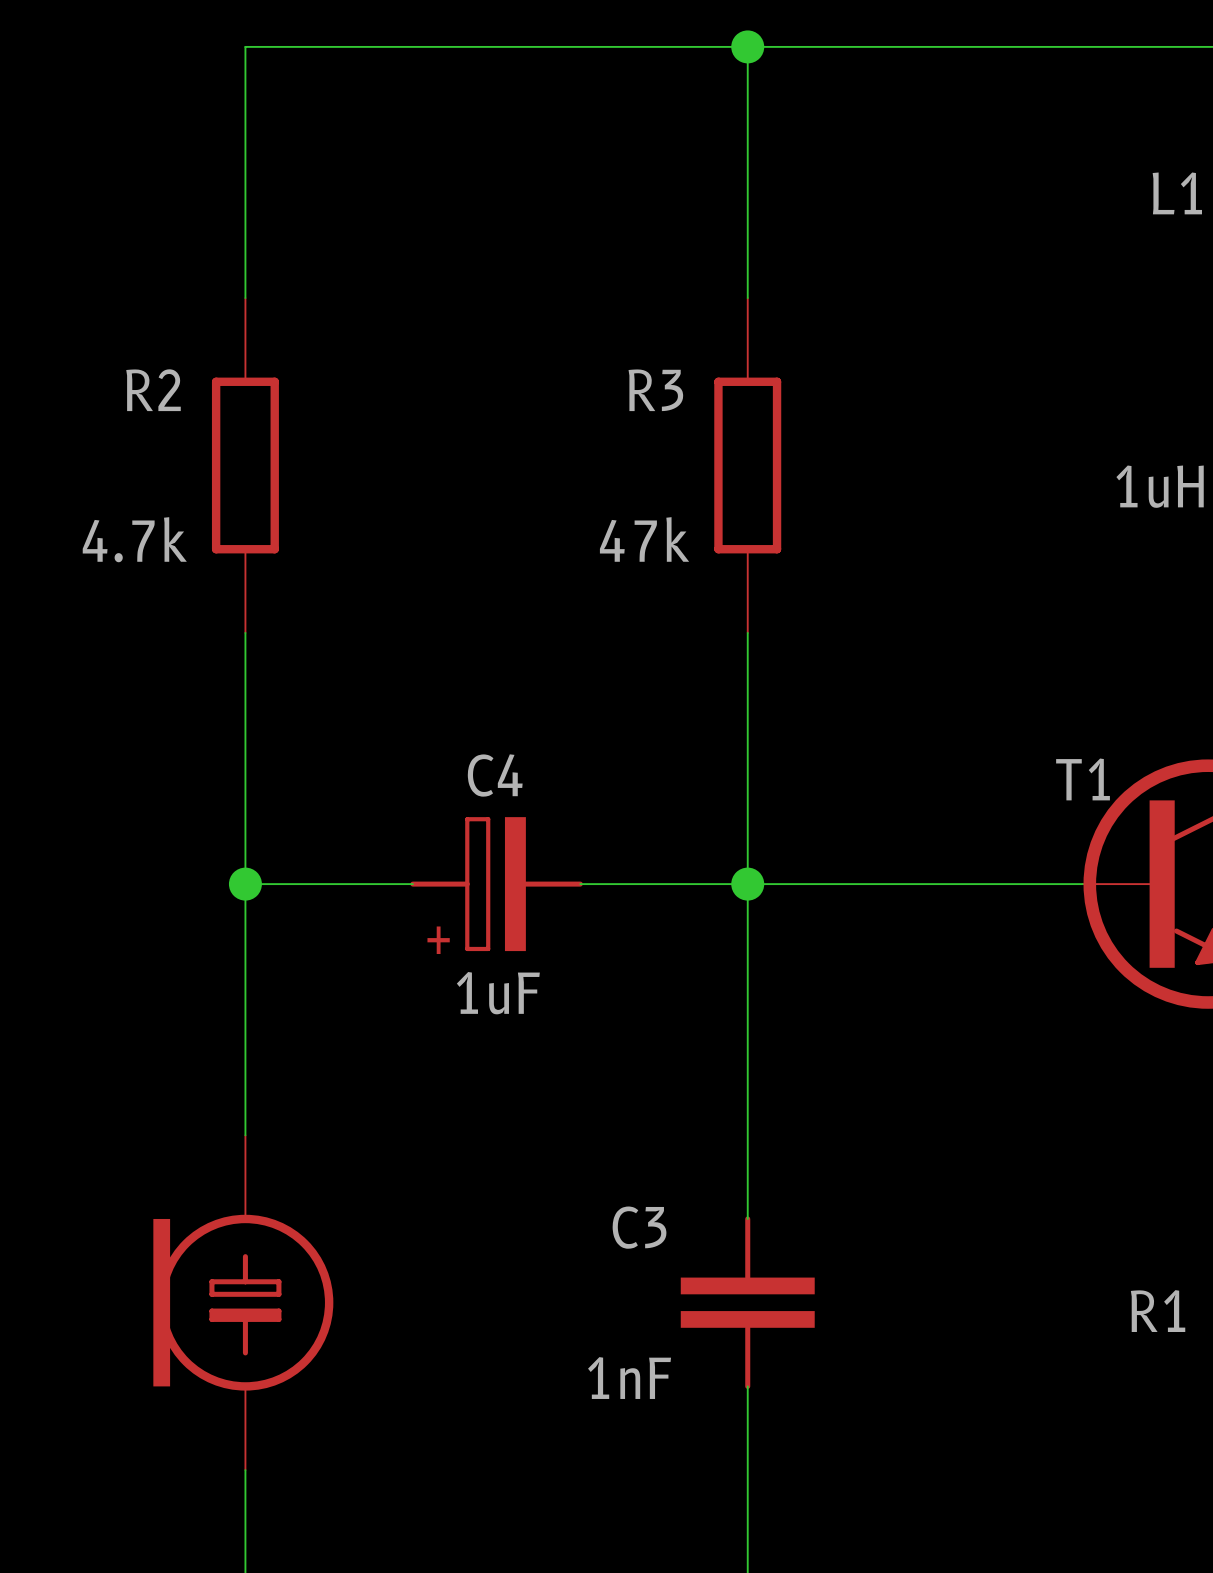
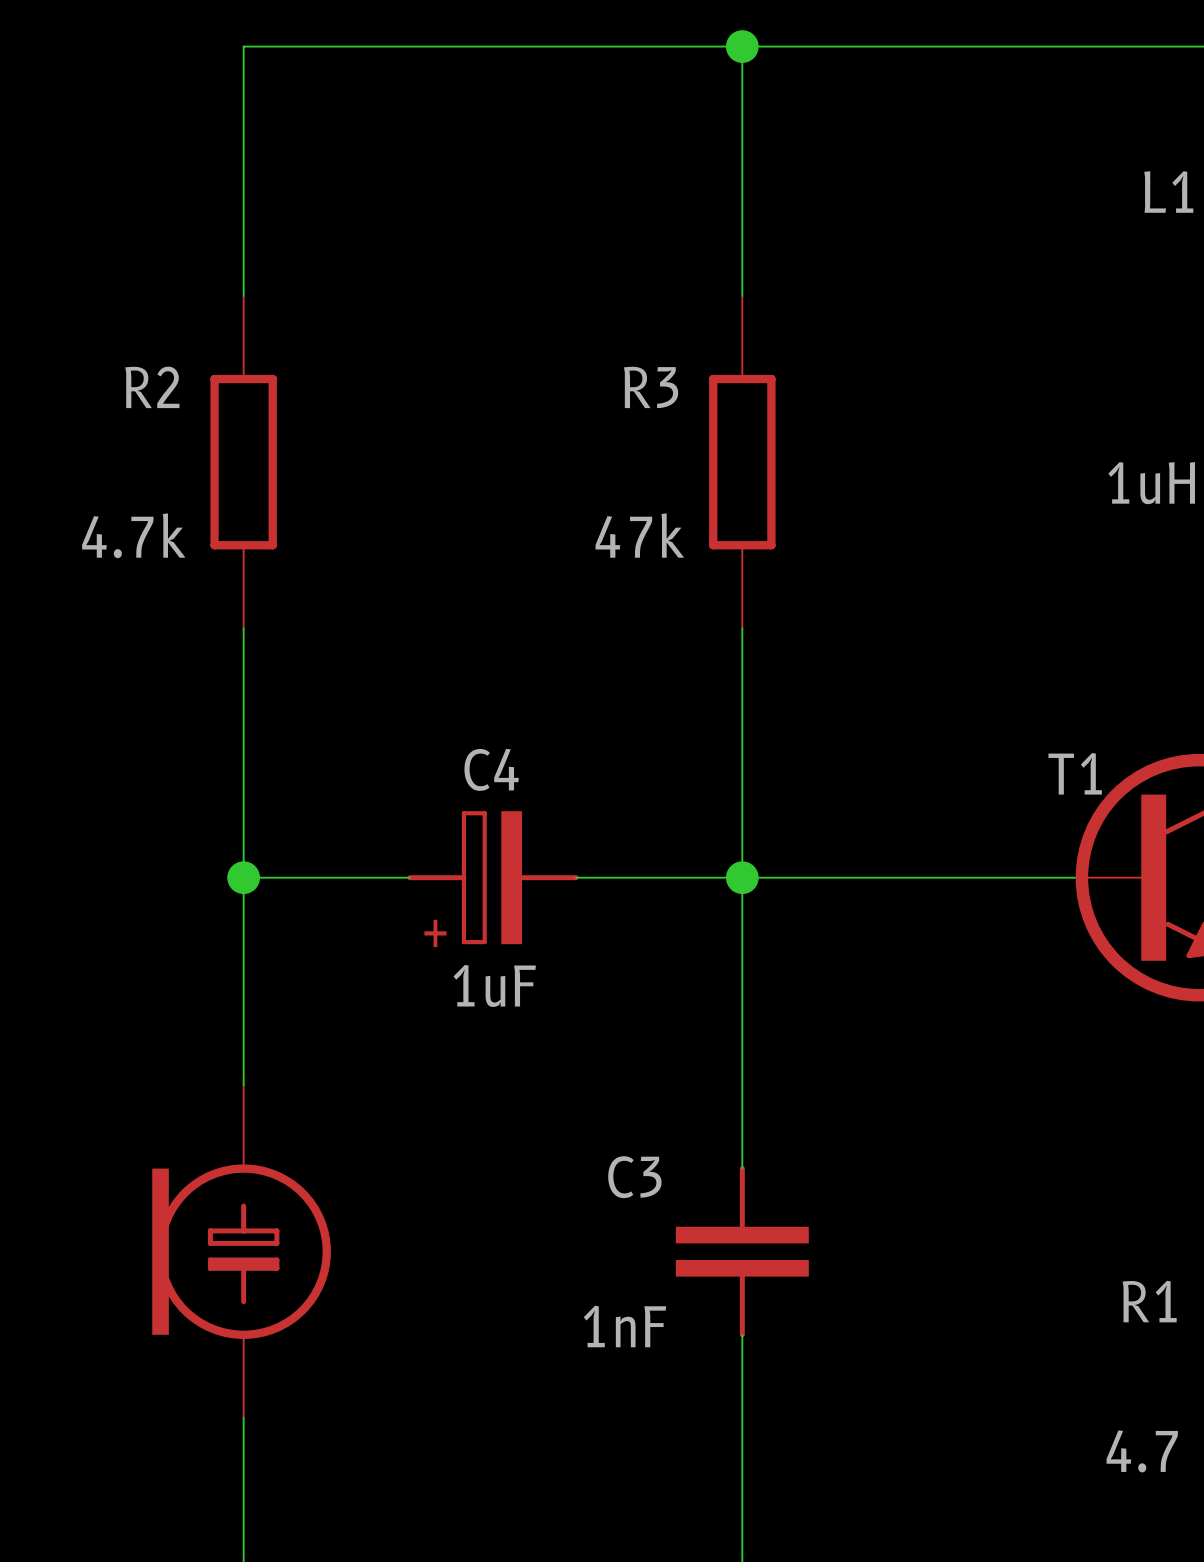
part position: (243, 1302) -> (241, 1251)
C3 position: (747, 1302) -> (742, 1251)
R1 value: none -> 4.7 (1142, 1451)

